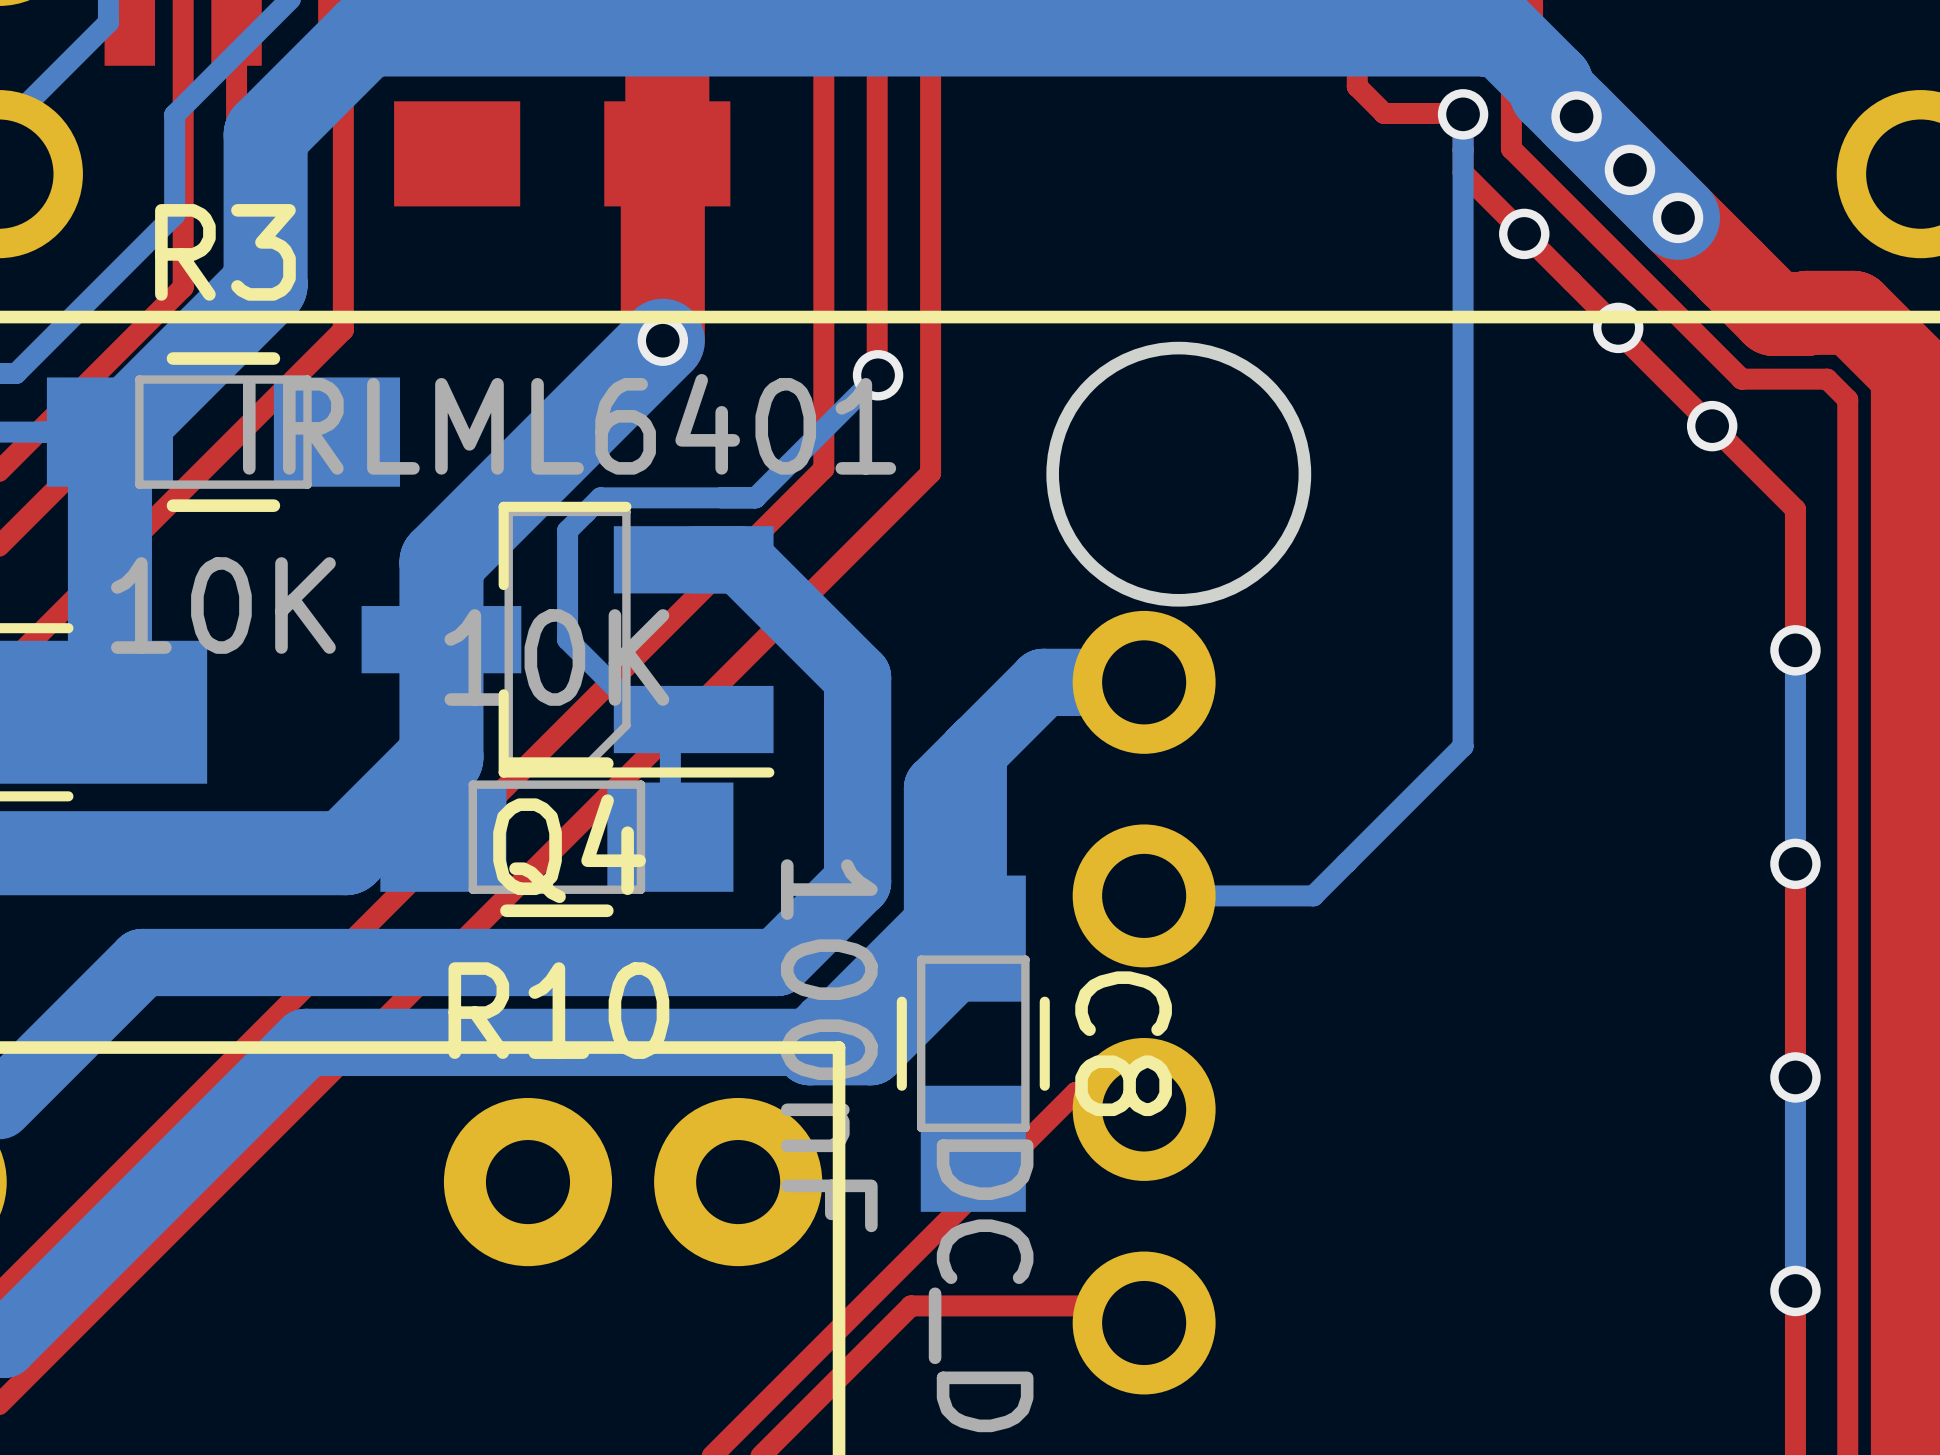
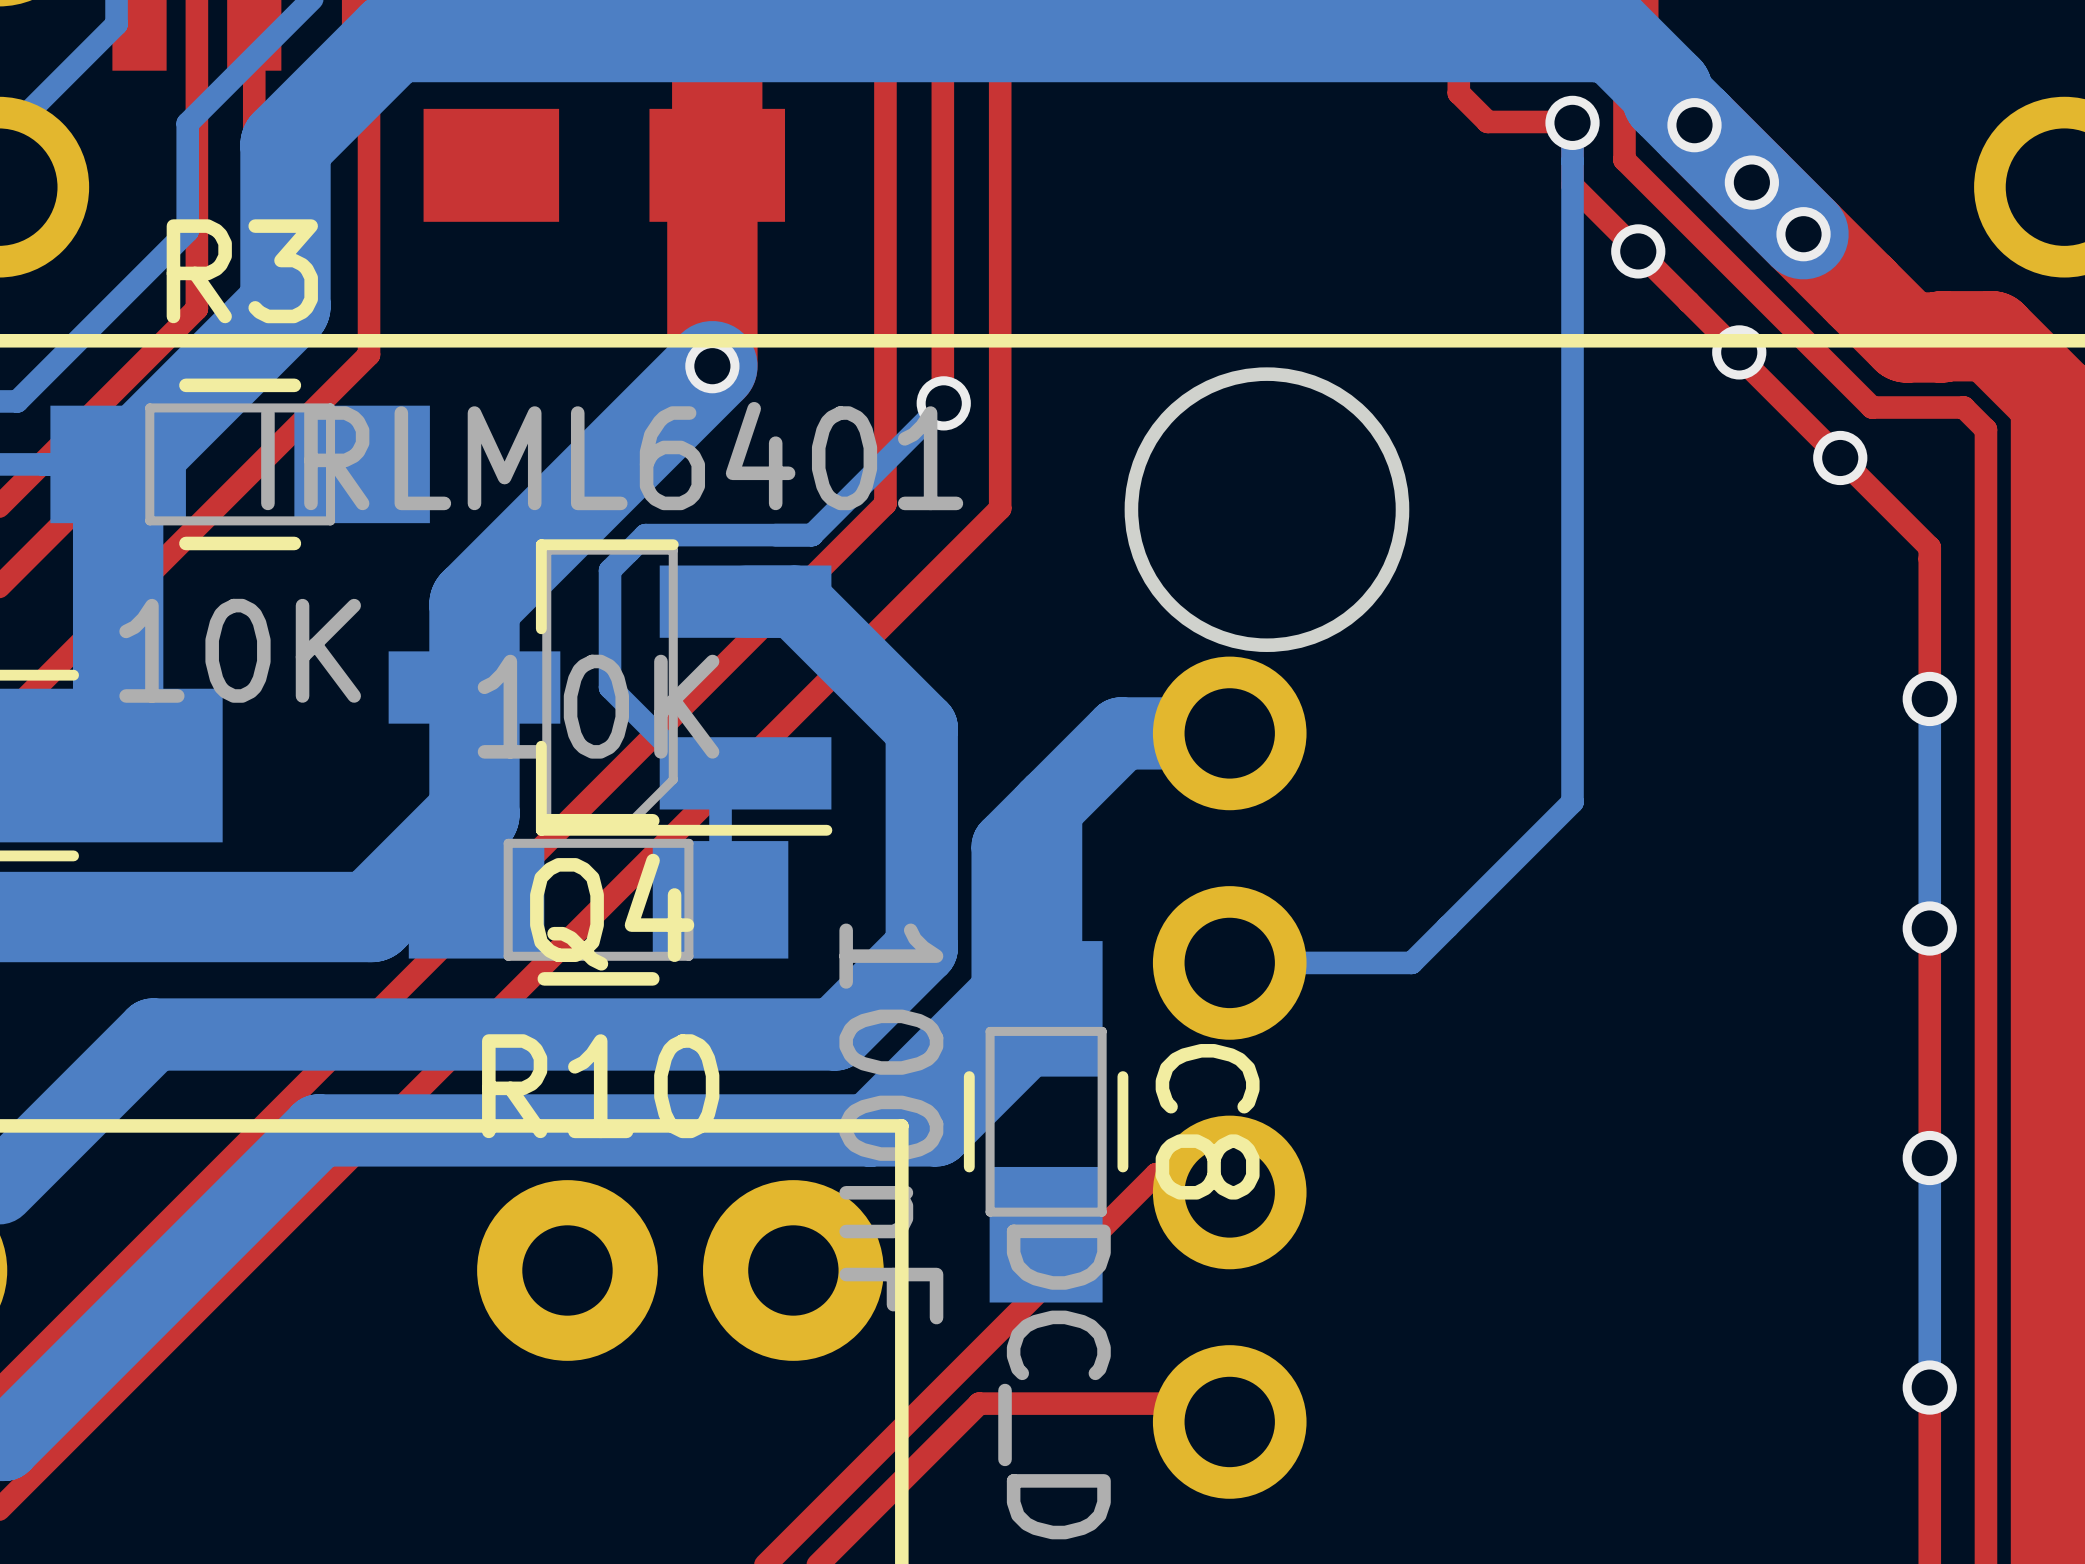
bottom track: (836, 1025) (827, 1025) (810, 1042) (305, 1042) (296, 1051) -> (870, 1130) (318, 1130)

